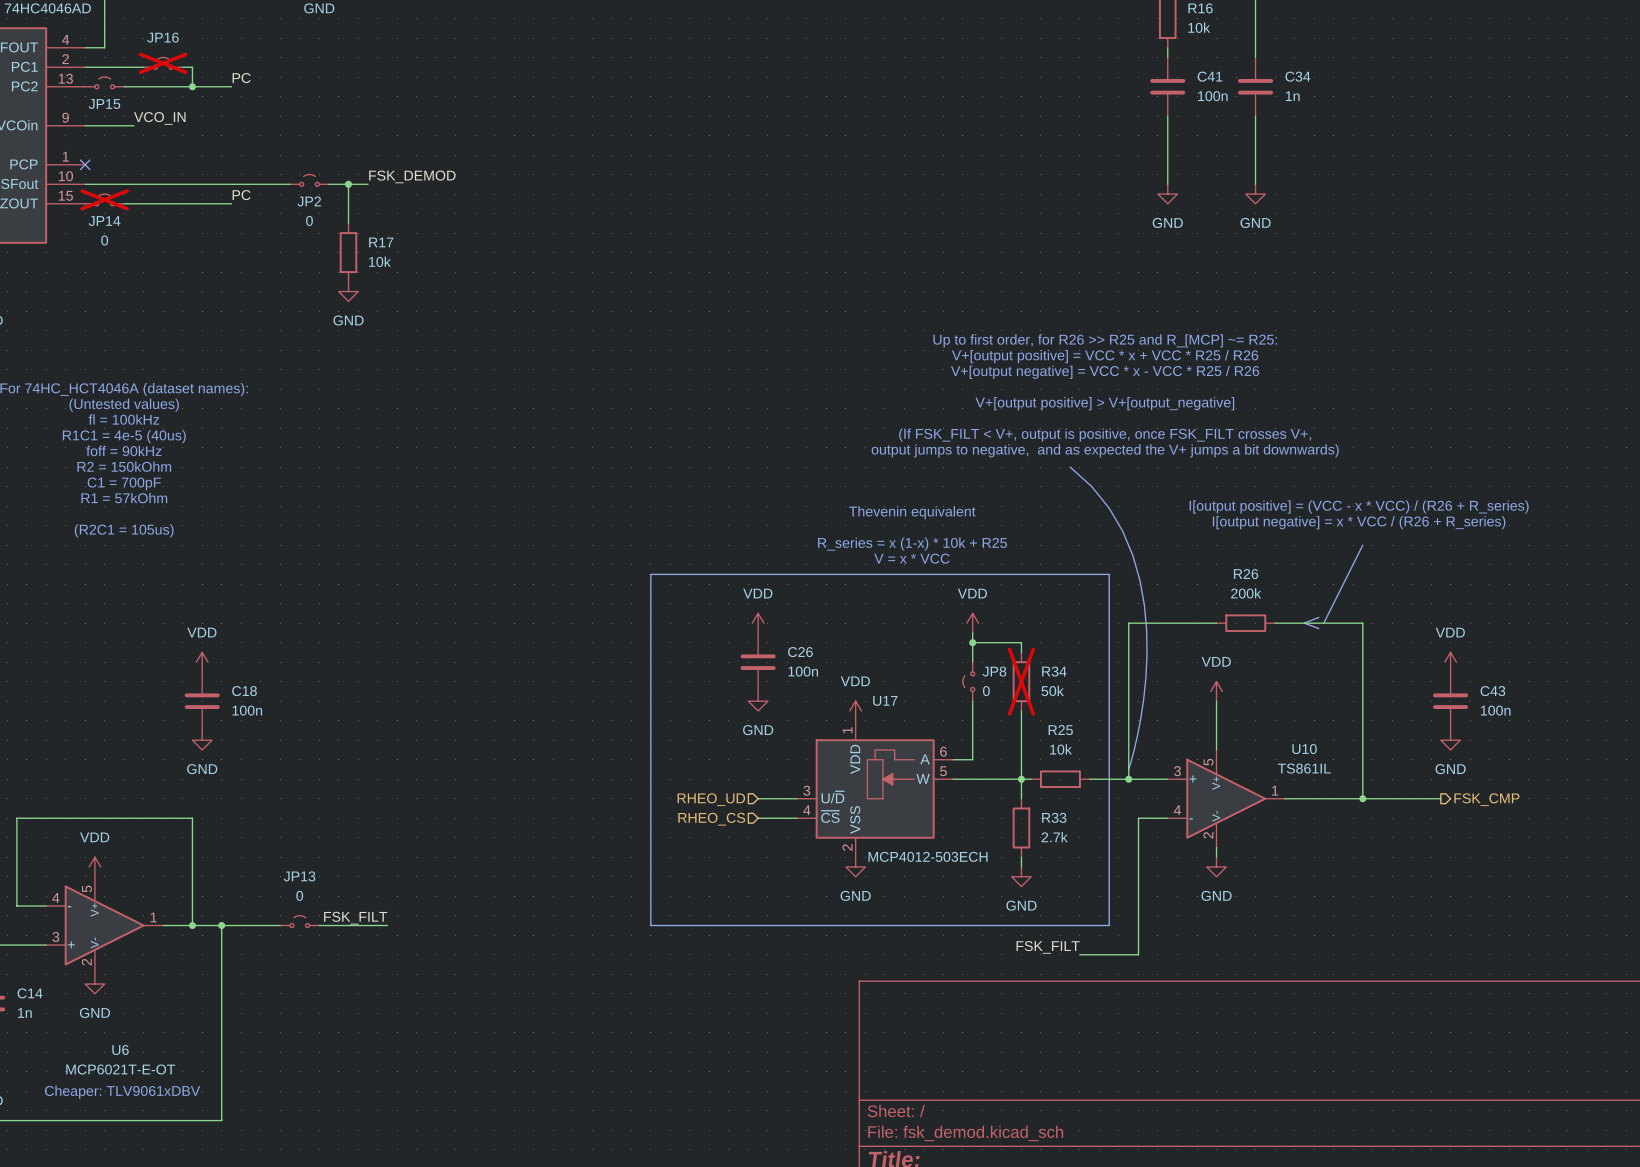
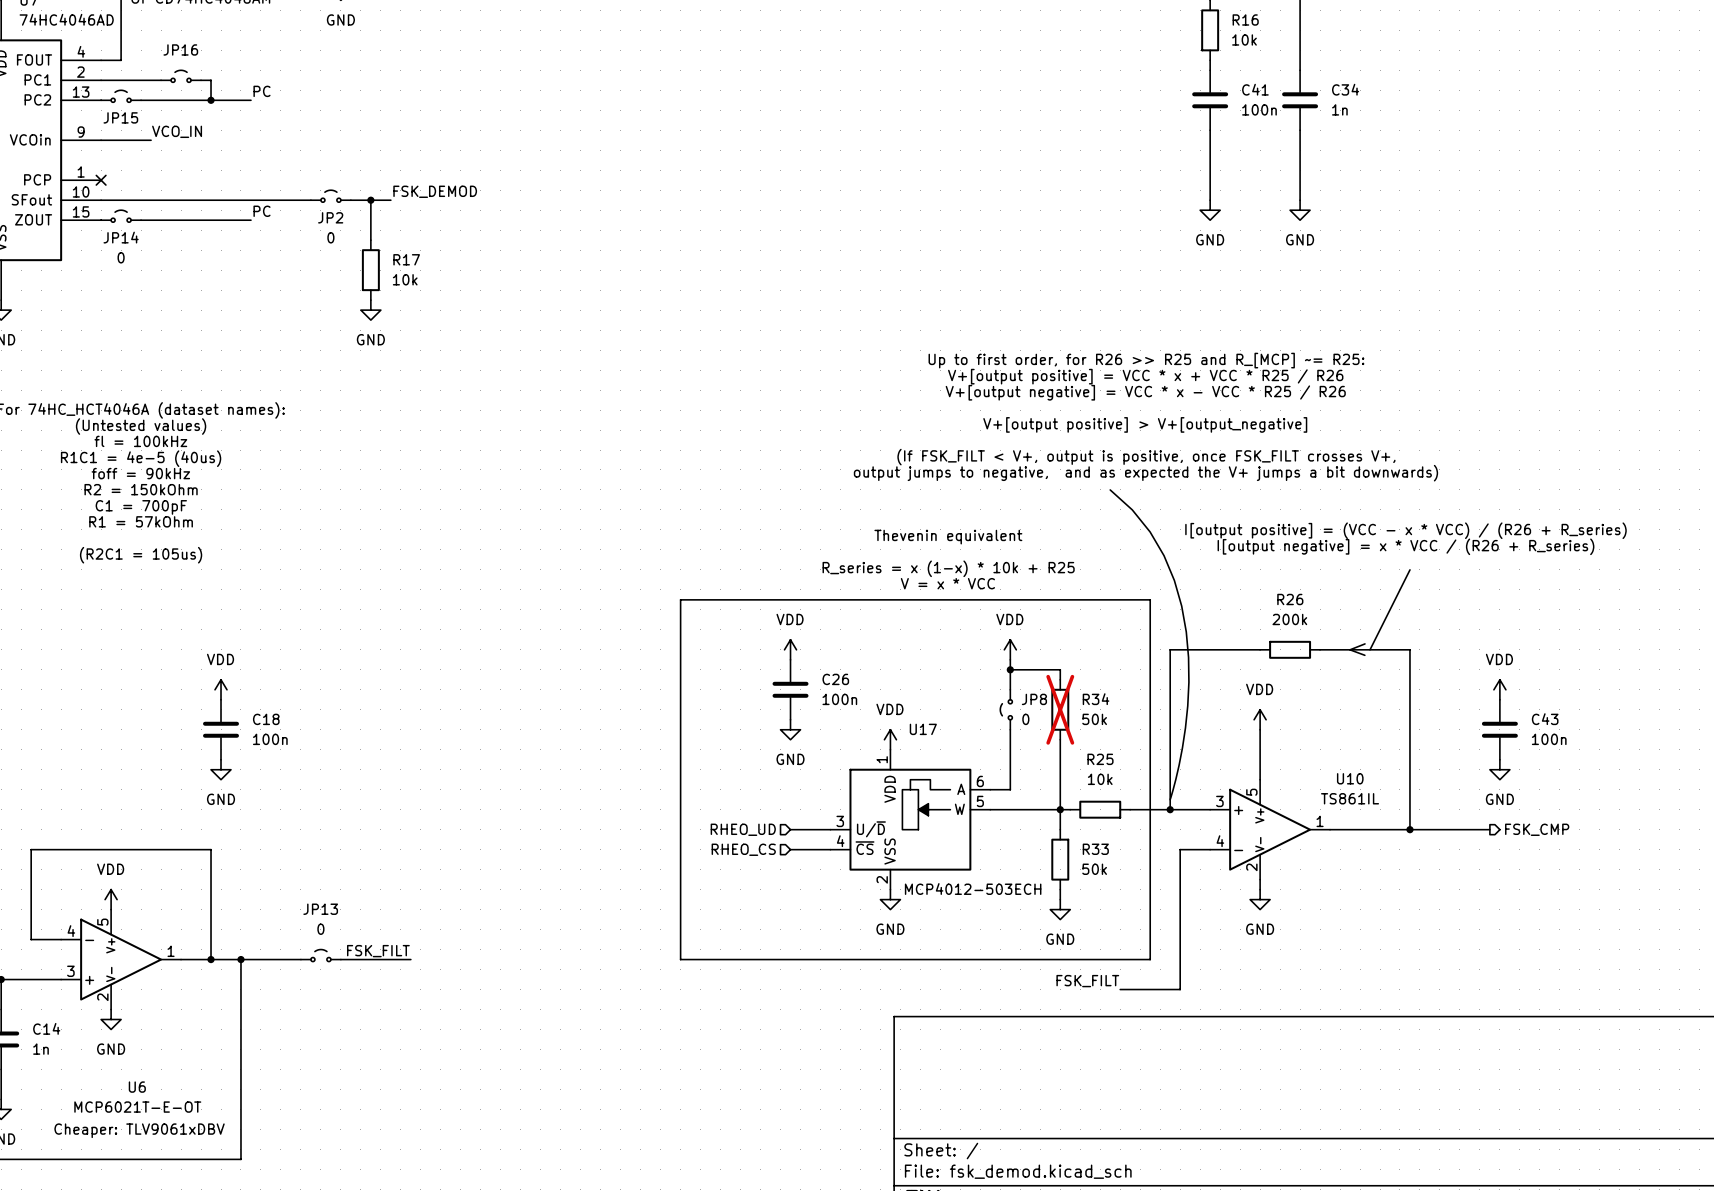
JP16 do-not-place cross: (163, 63) -> none
JP14 do-not-place cross: (104, 199) -> none
R33 value: 2.7k (1054, 837) -> 50k (1094, 869)

